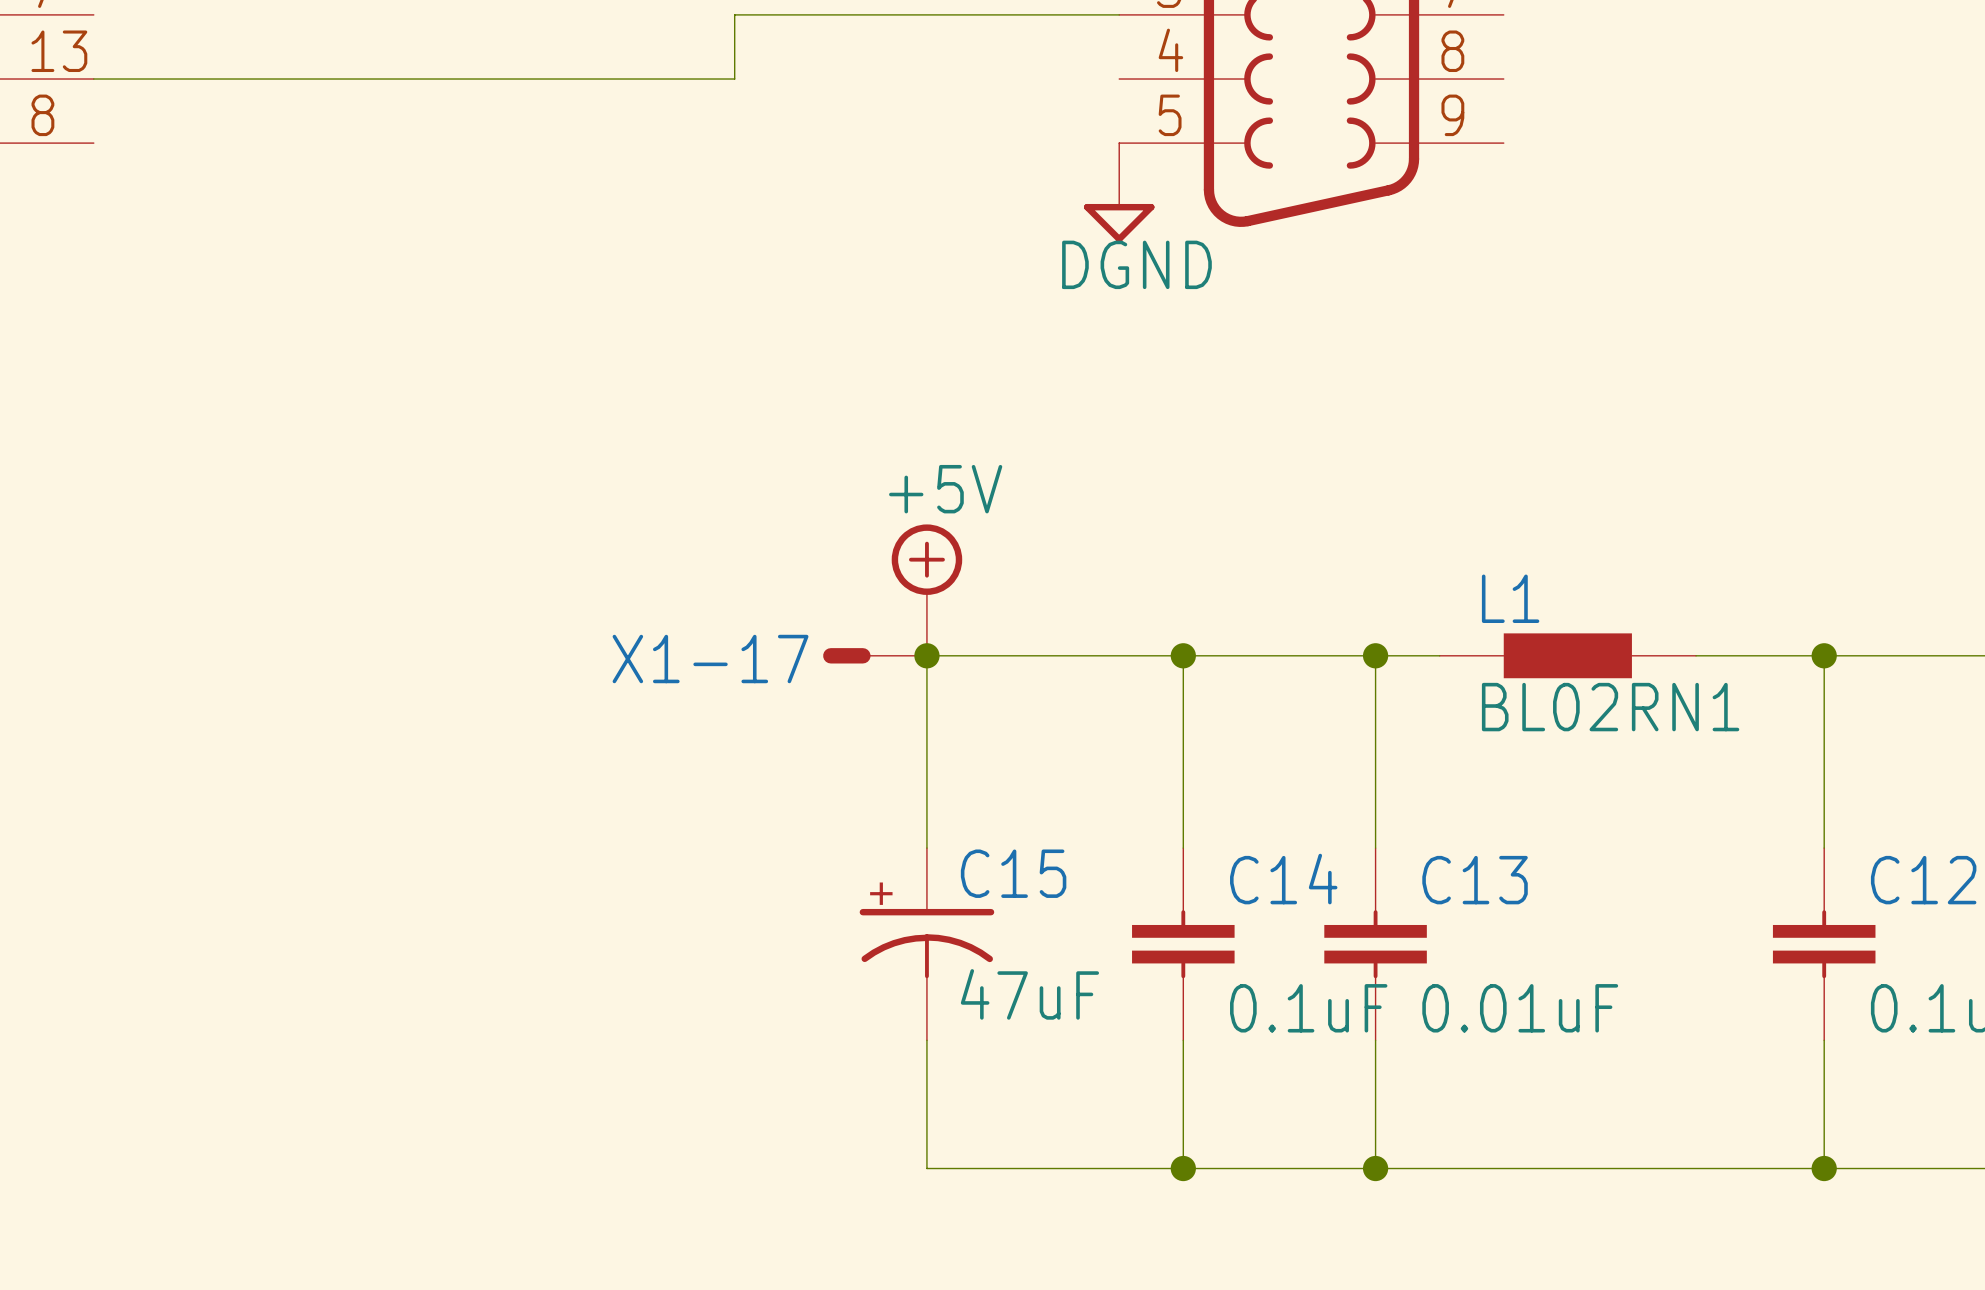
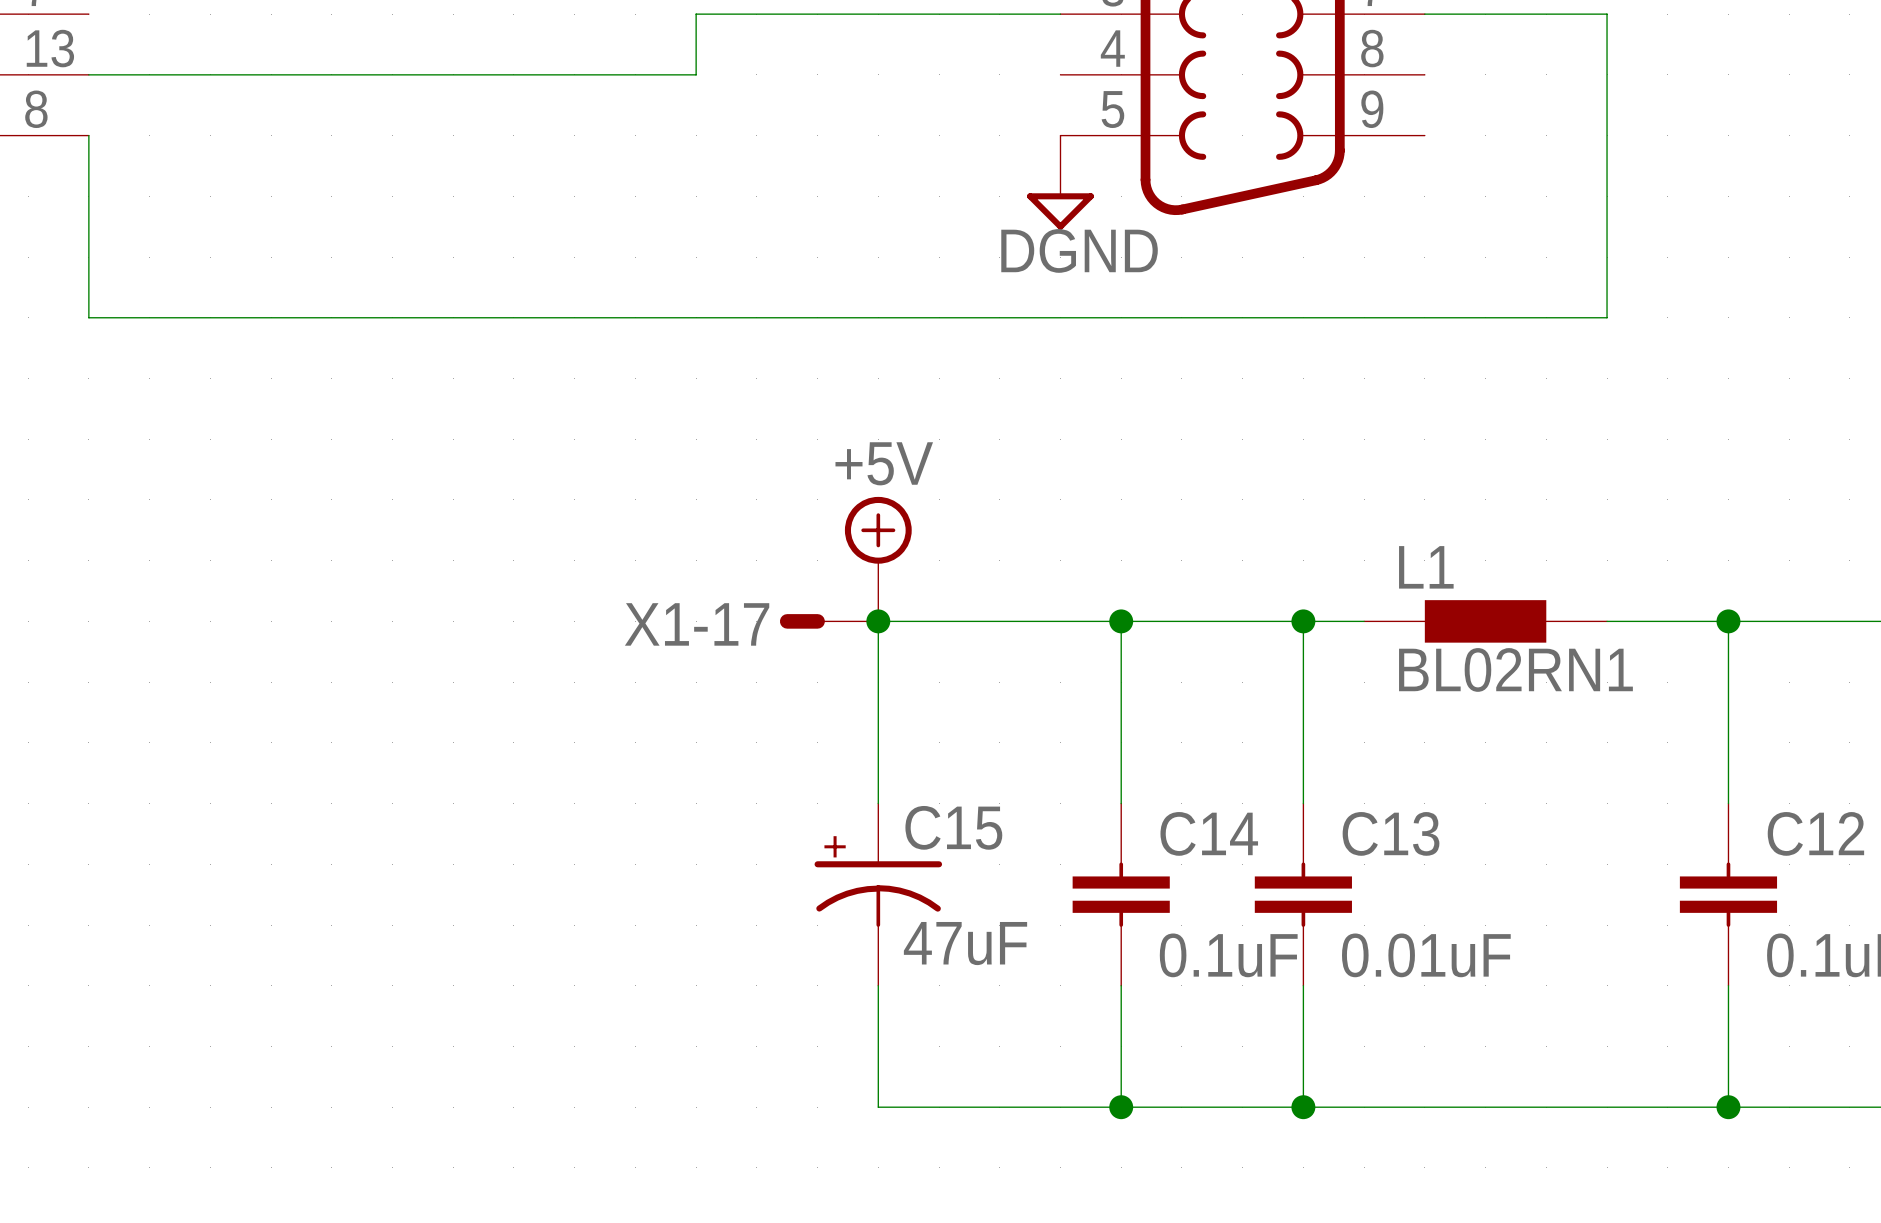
wire: none -> (1424, 14) (1607, 14) (1607, 317) (88, 317) (88, 135)

